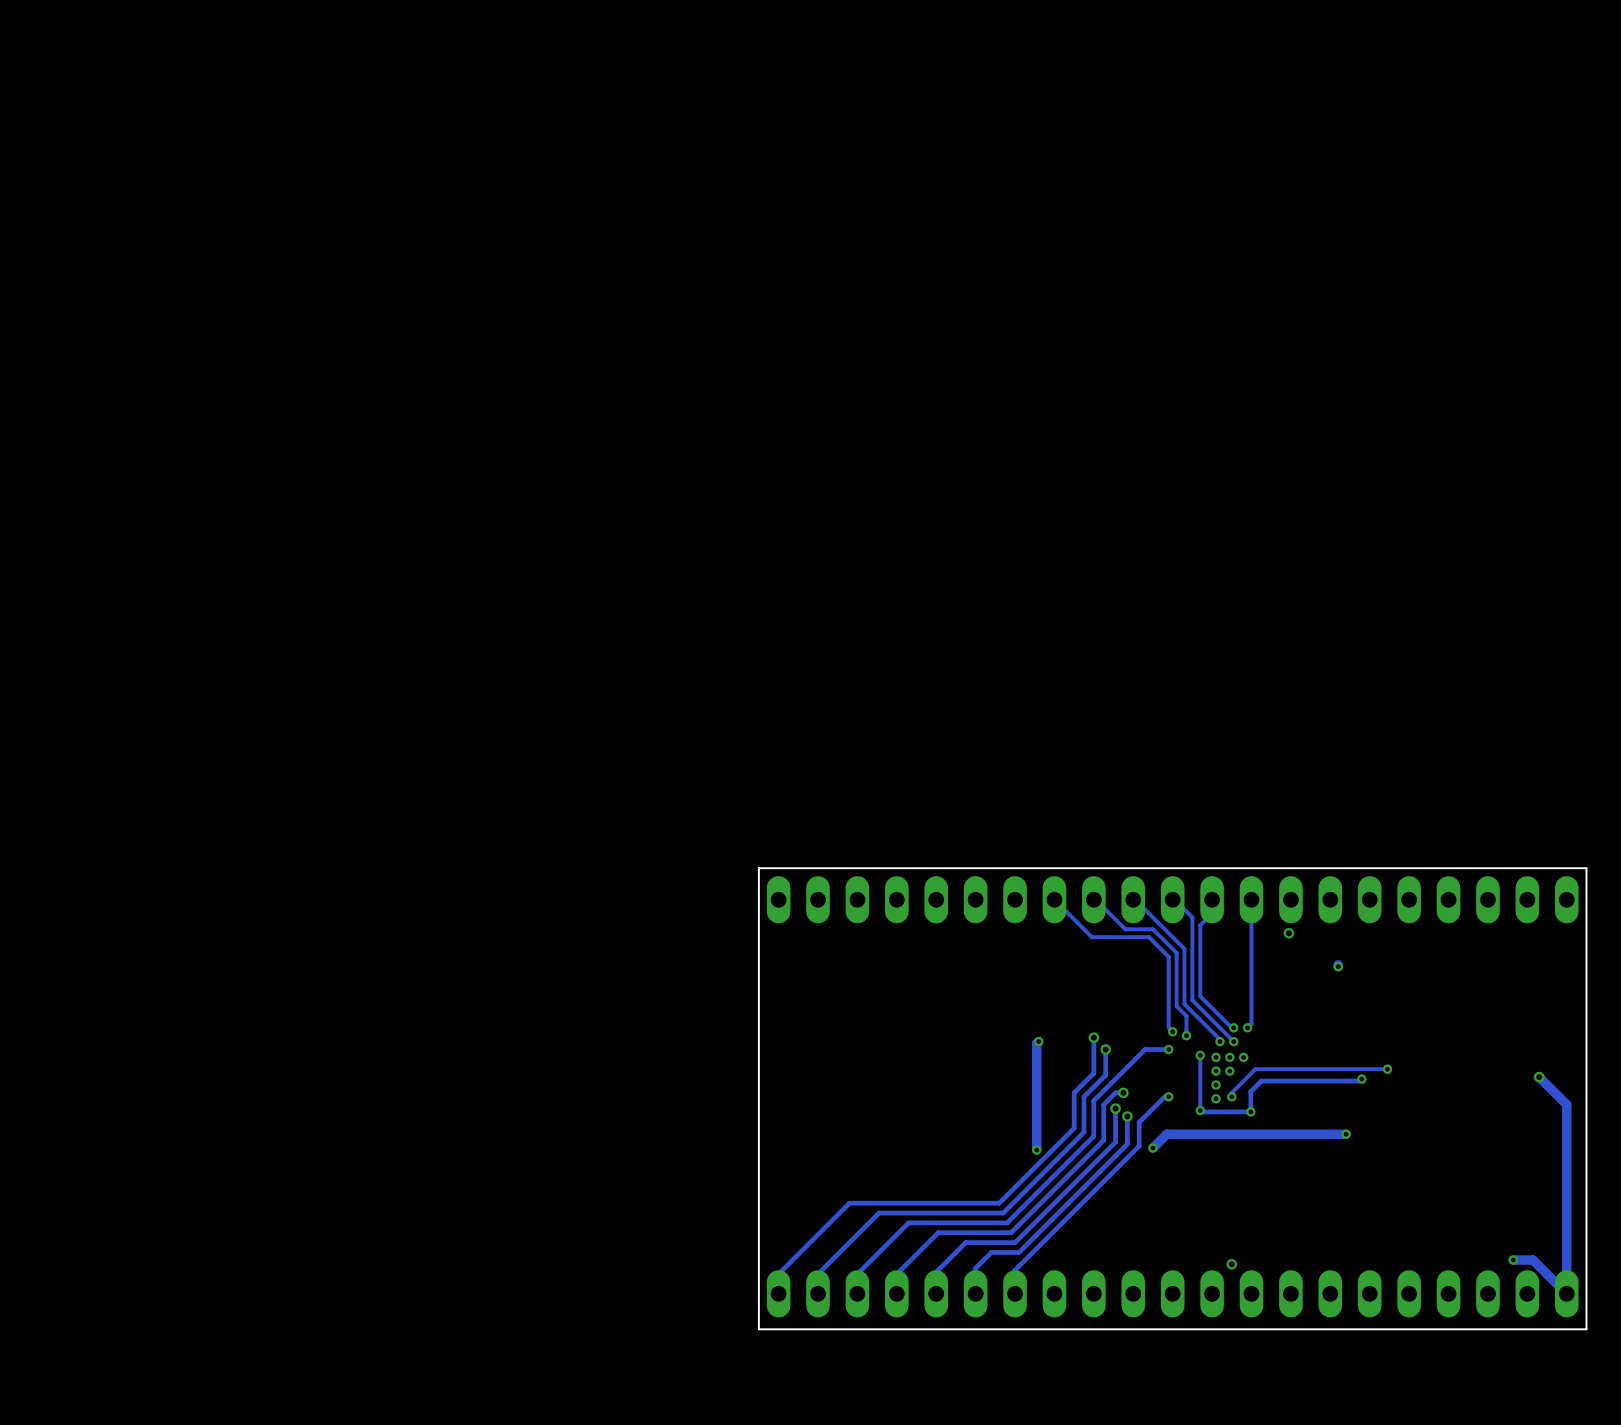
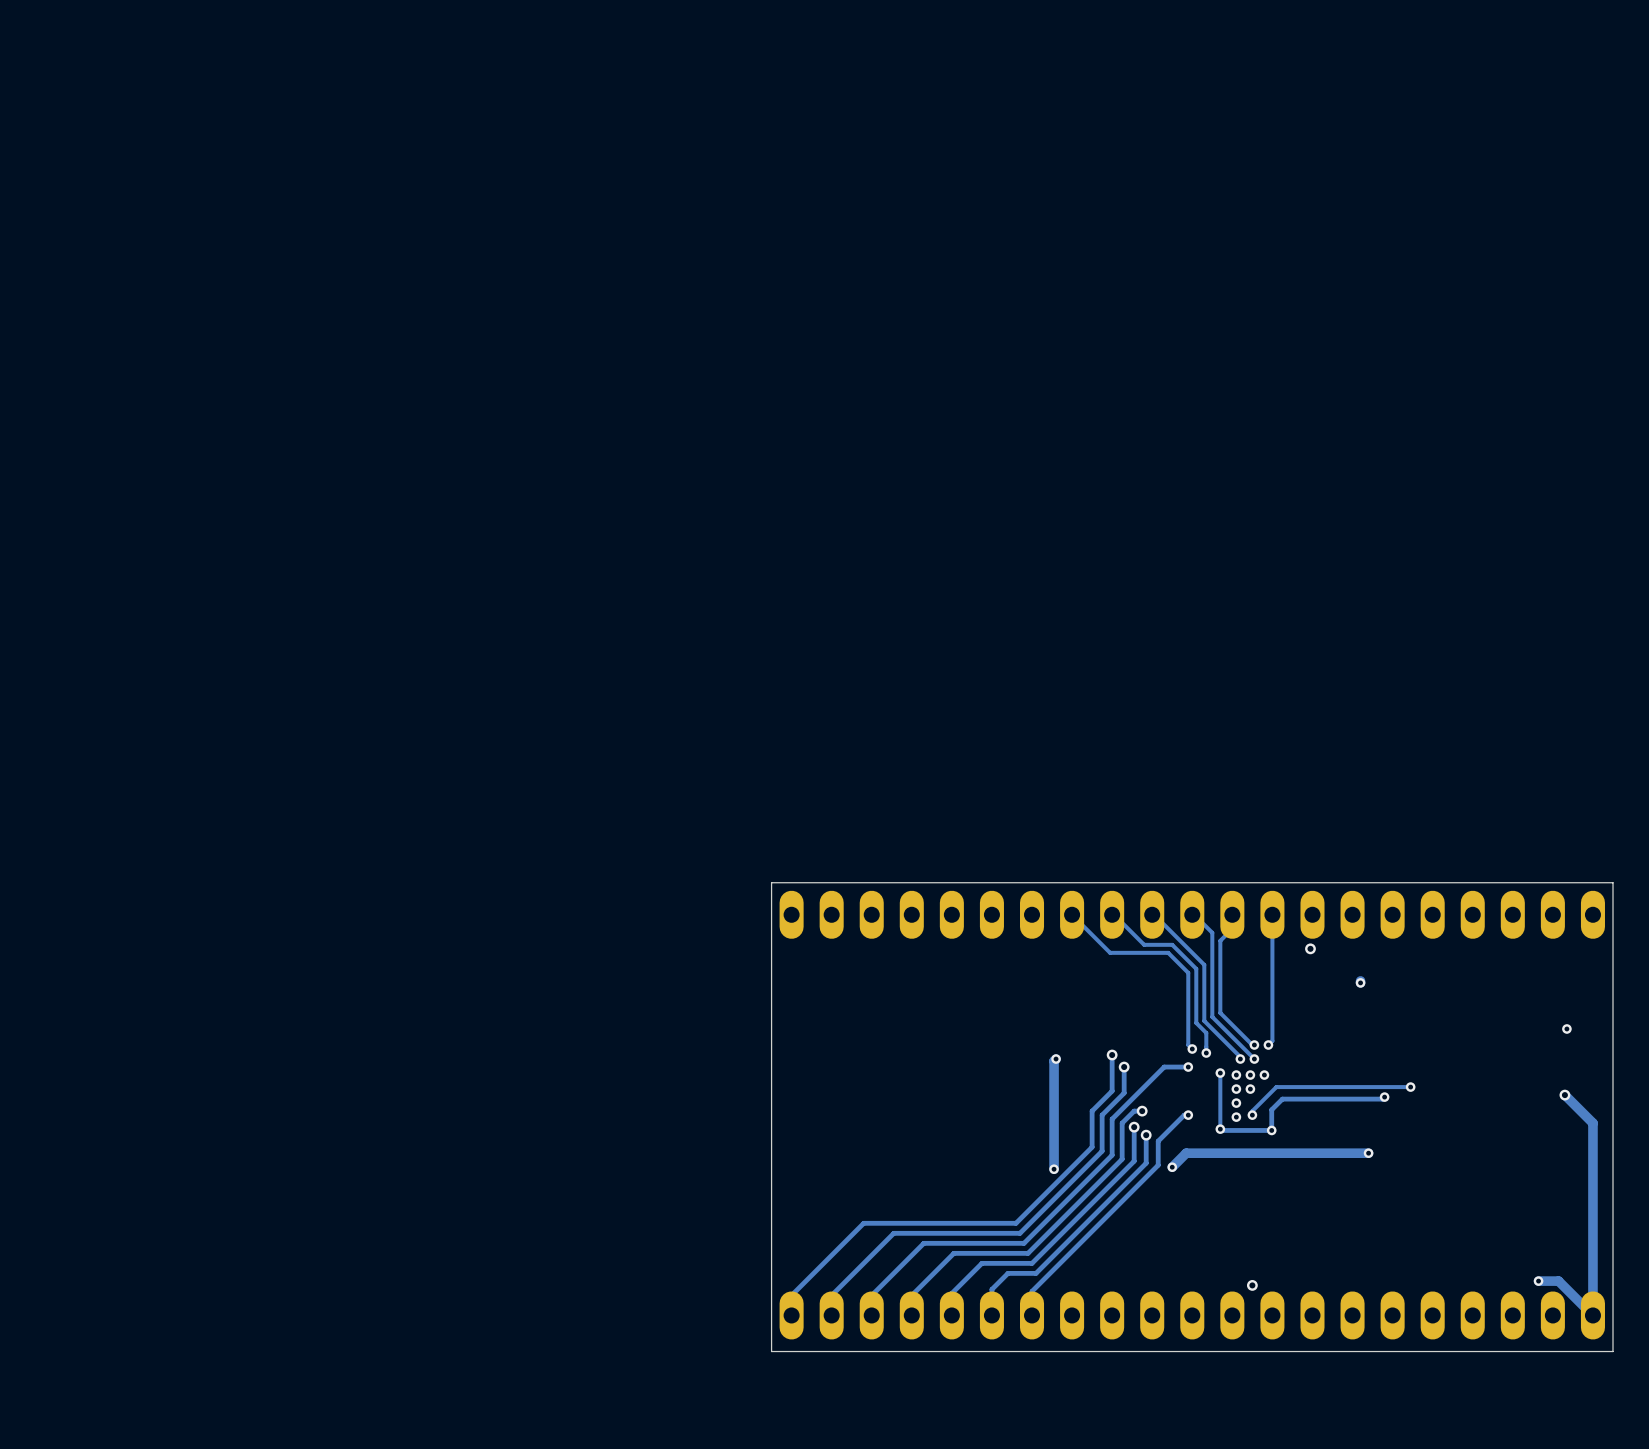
via: none -> (1566, 1028)

